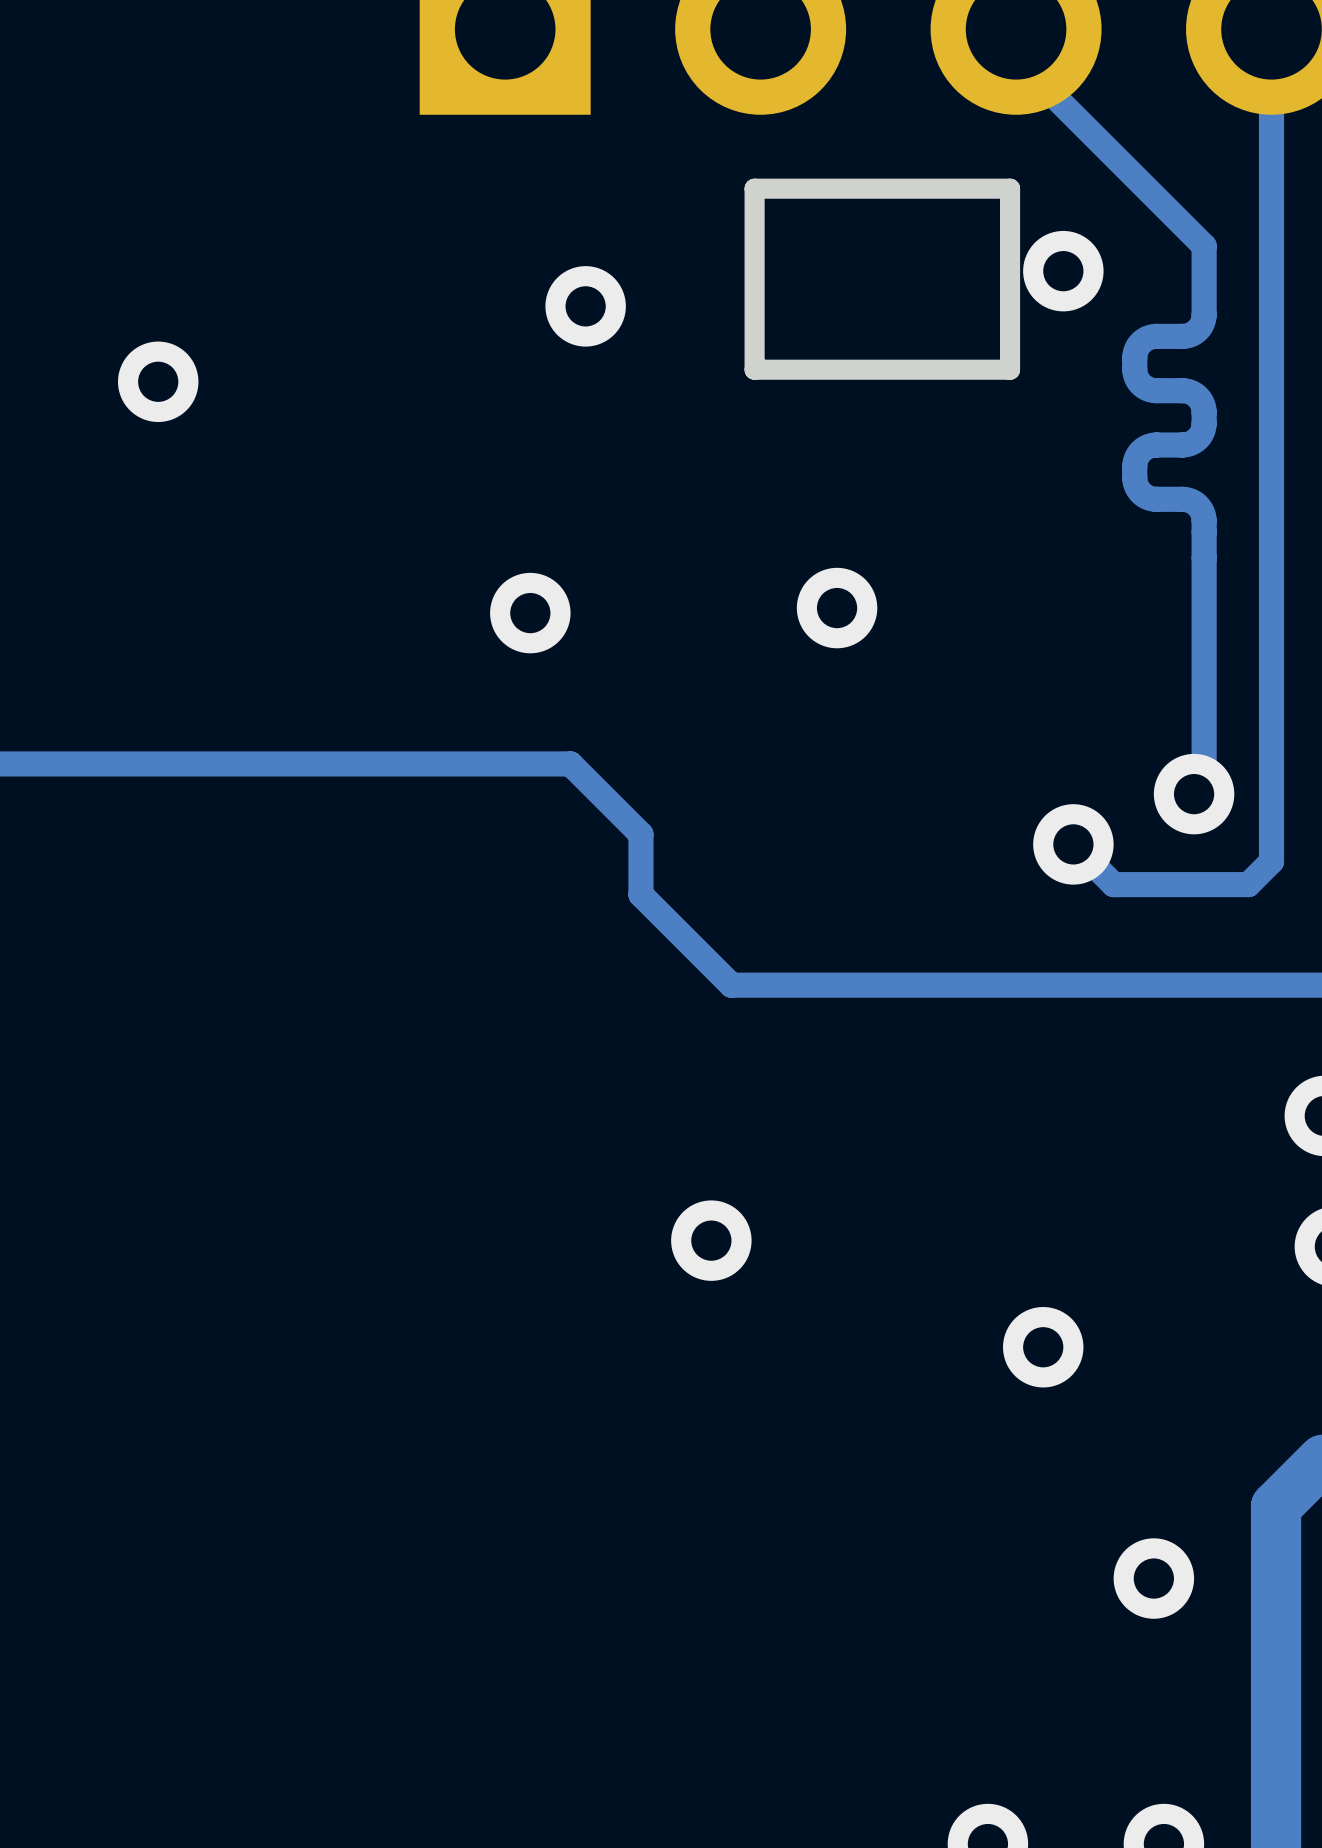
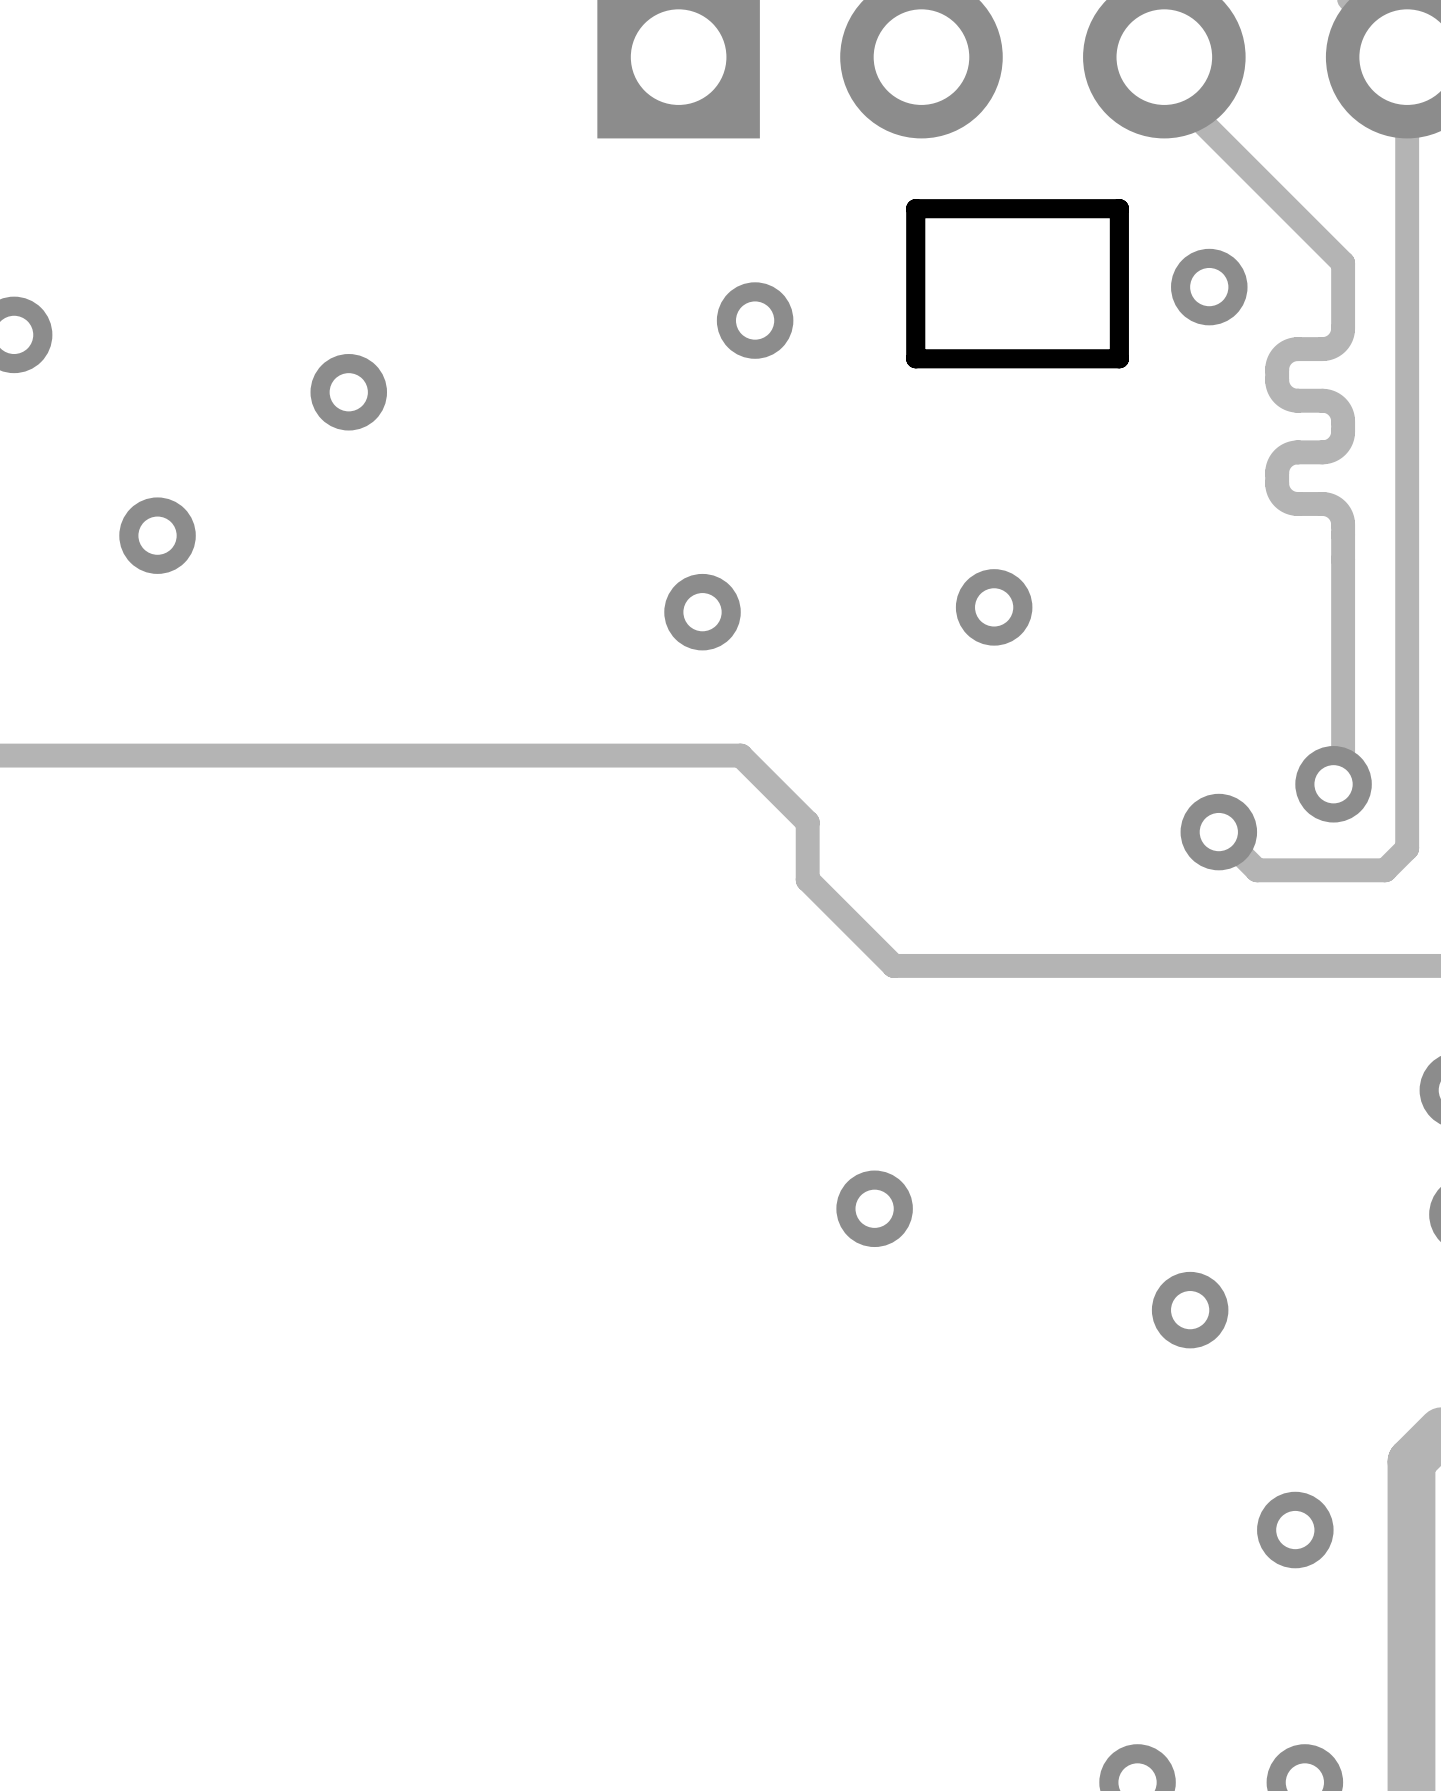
board edge: (968, 188) (1010, 188) (1010, 369) (754, 369) (754, 346) -> (1119, 208) (1119, 358) (915, 358)

